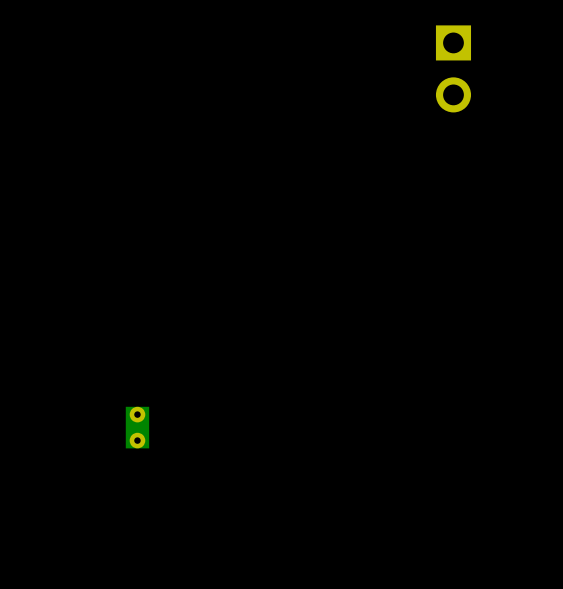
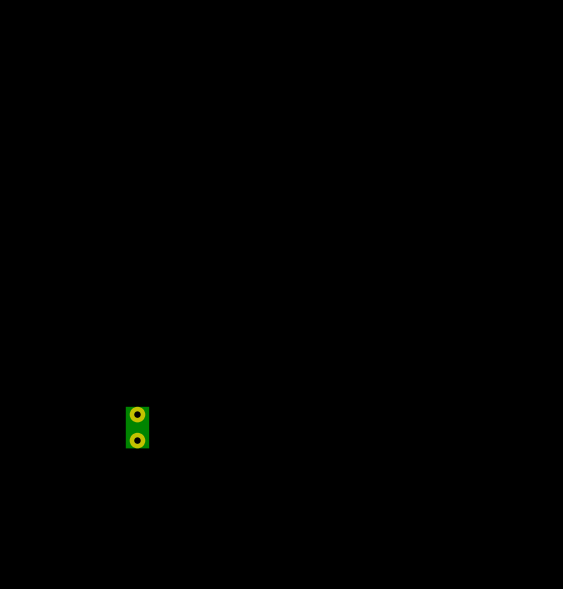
part: (453, 68) -> none

